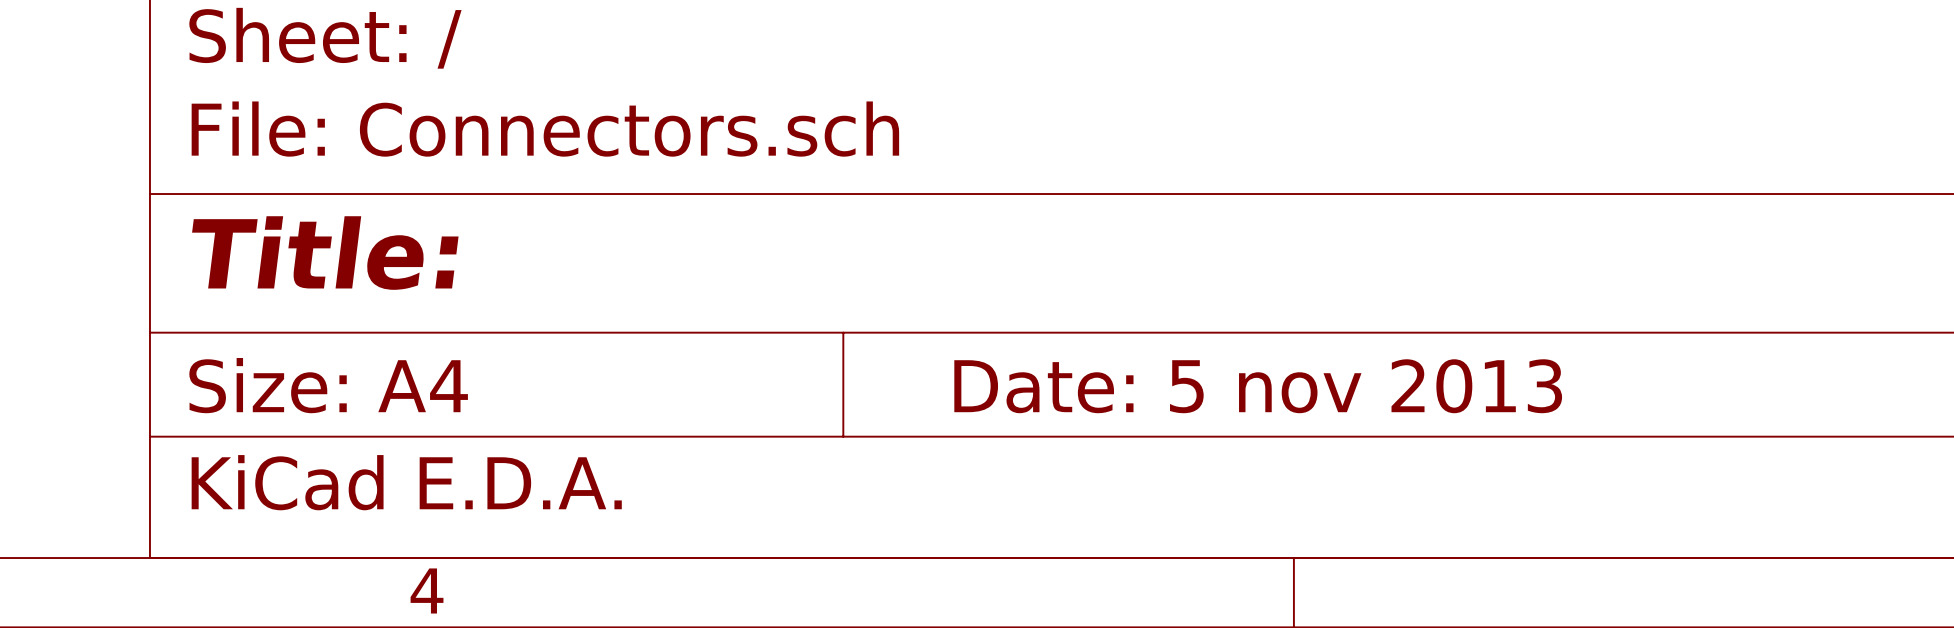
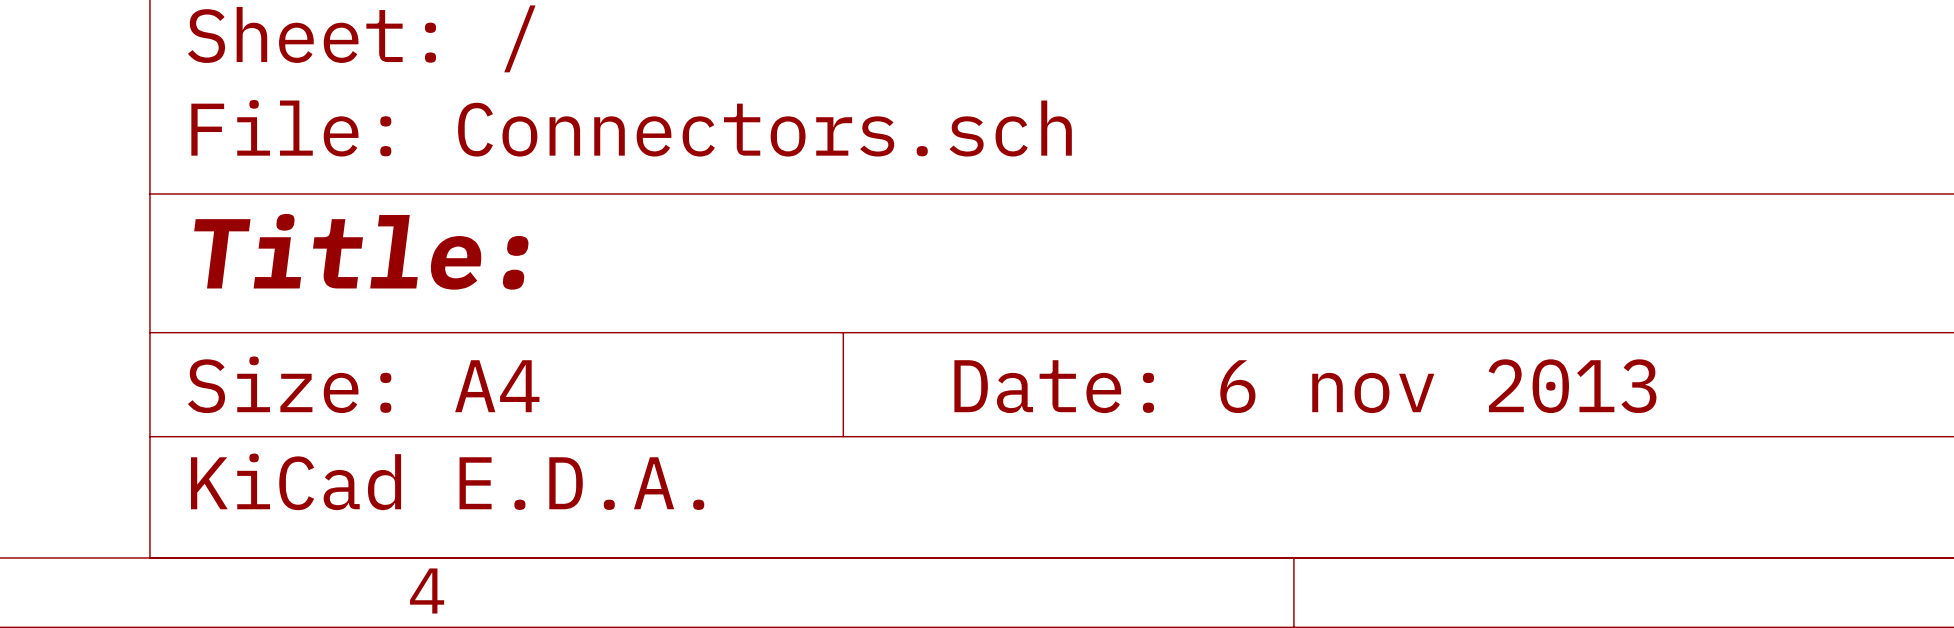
title block: Date: 5 nov 2013 (1258, 386) -> Date: 6 nov 2013 (1305, 386)

